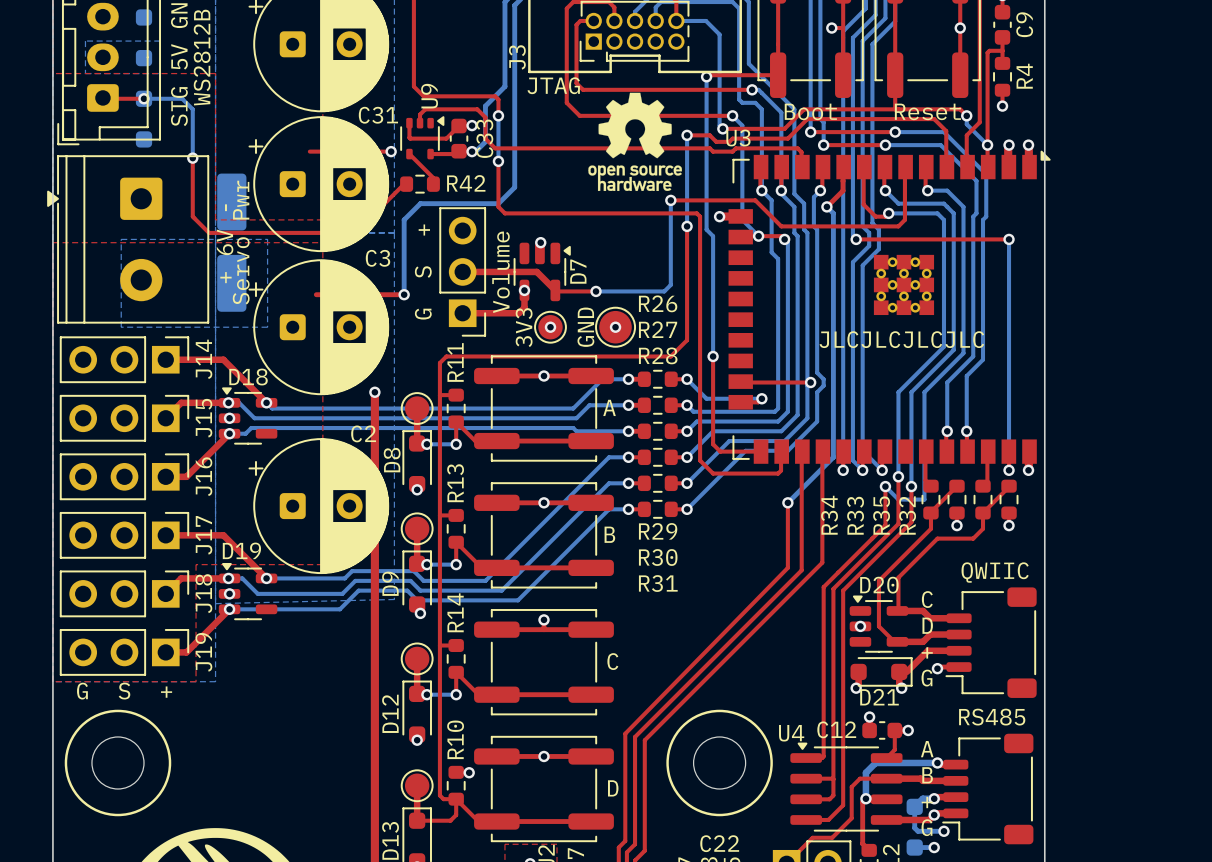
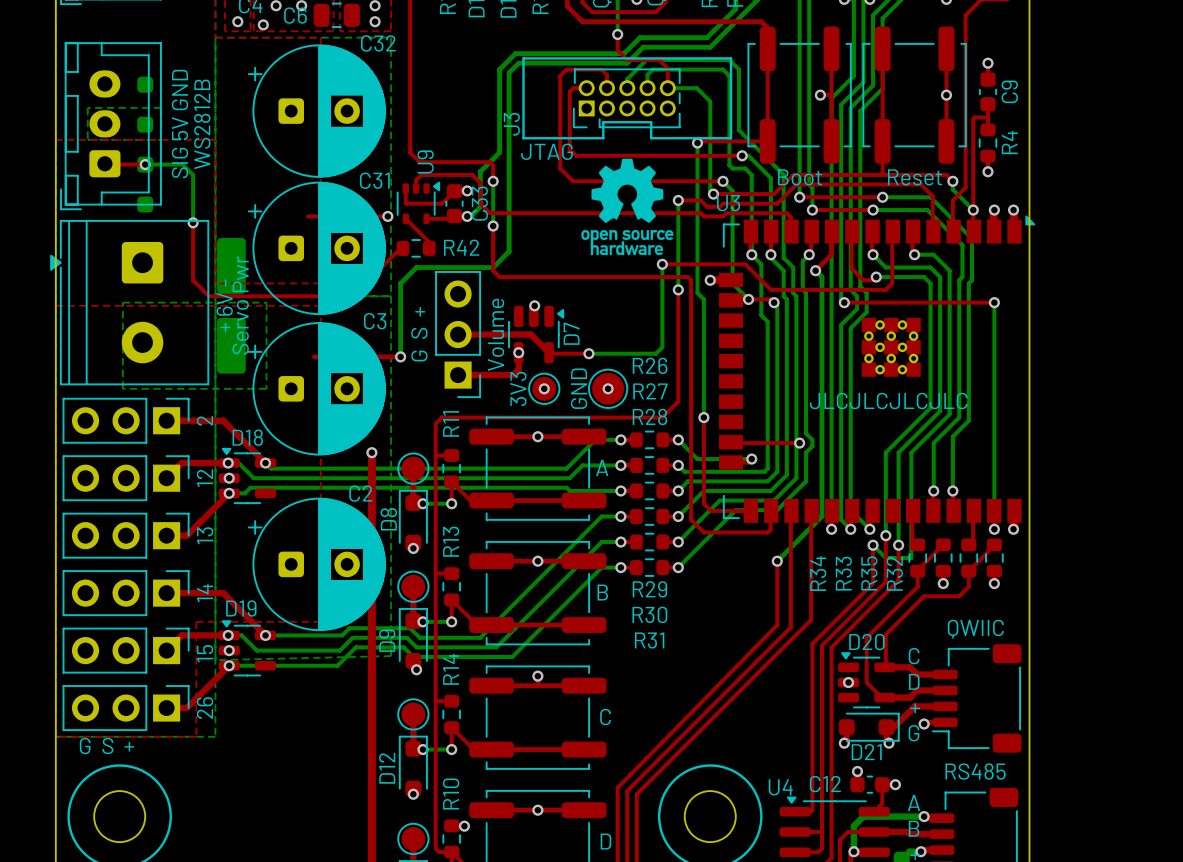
J14 name: J14 (204, 359) -> none
text: none -> 2 (204, 420)
J15 name: J15 (204, 418) -> none
text: none -> 12 (204, 478)
J16 name: J16 (204, 476) -> none
text: none -> 13 (205, 535)
J17 name: J17 (204, 535) -> none
text: none -> 14 (205, 593)
J18 name: J18 (203, 593) -> none
text: none -> 15 (205, 653)
J19 name: J19 (203, 652) -> none
text: none -> 26 (205, 707)

